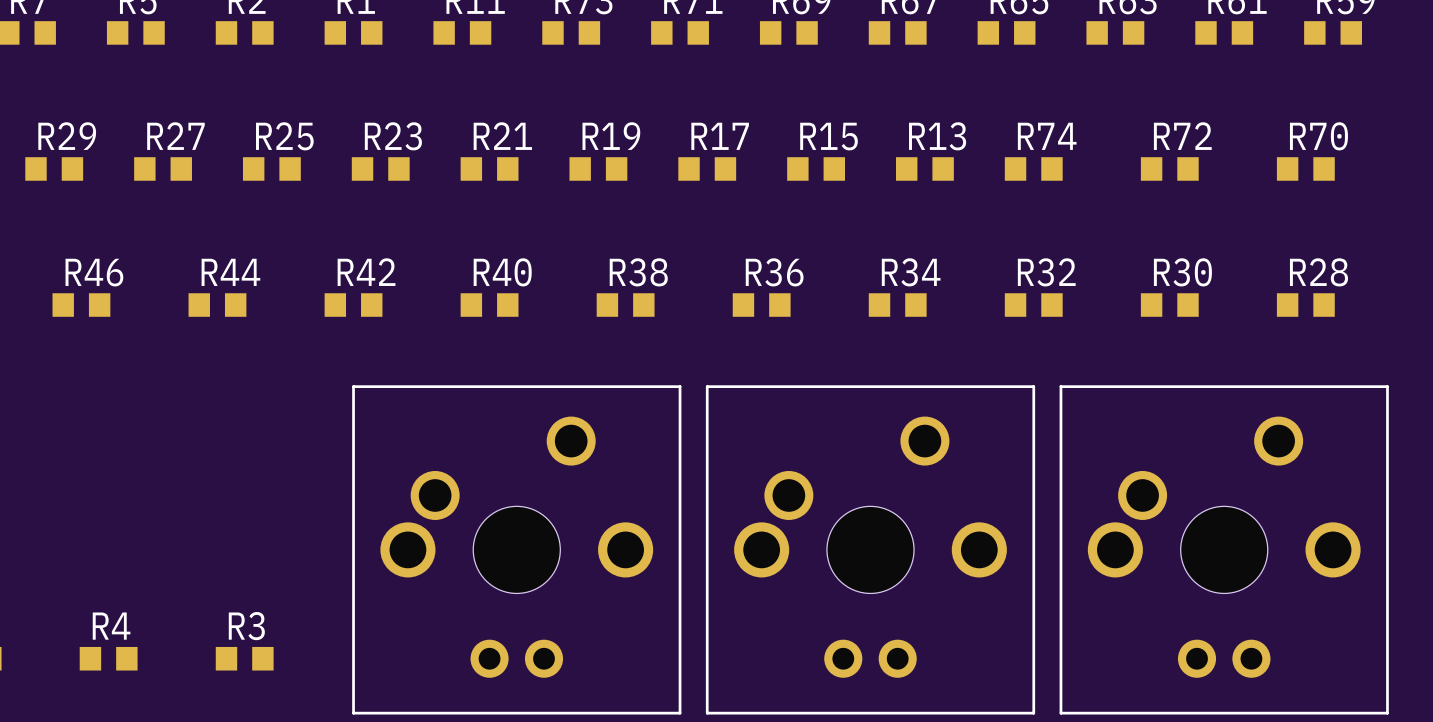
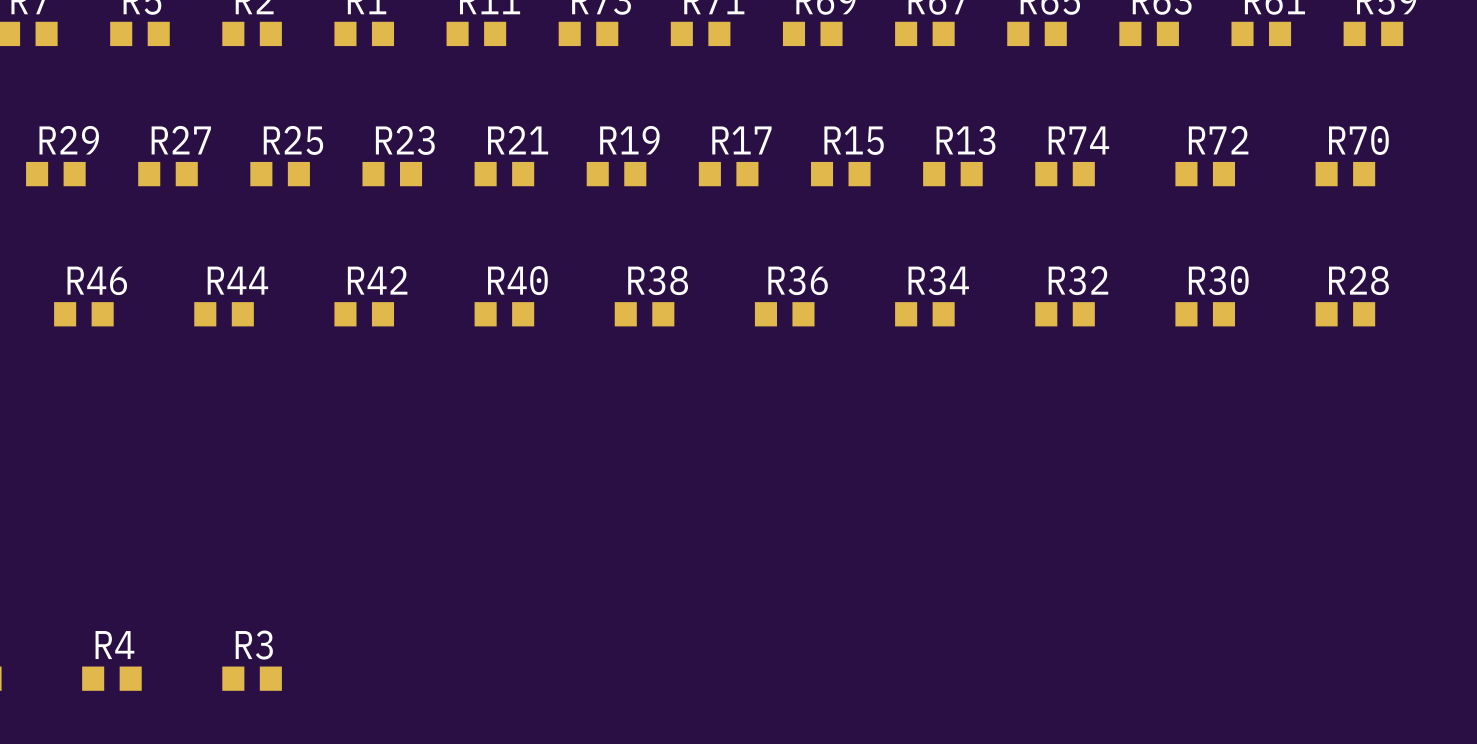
part: (516, 549) -> none
part: (870, 549) -> none
part: (1224, 549) -> none

